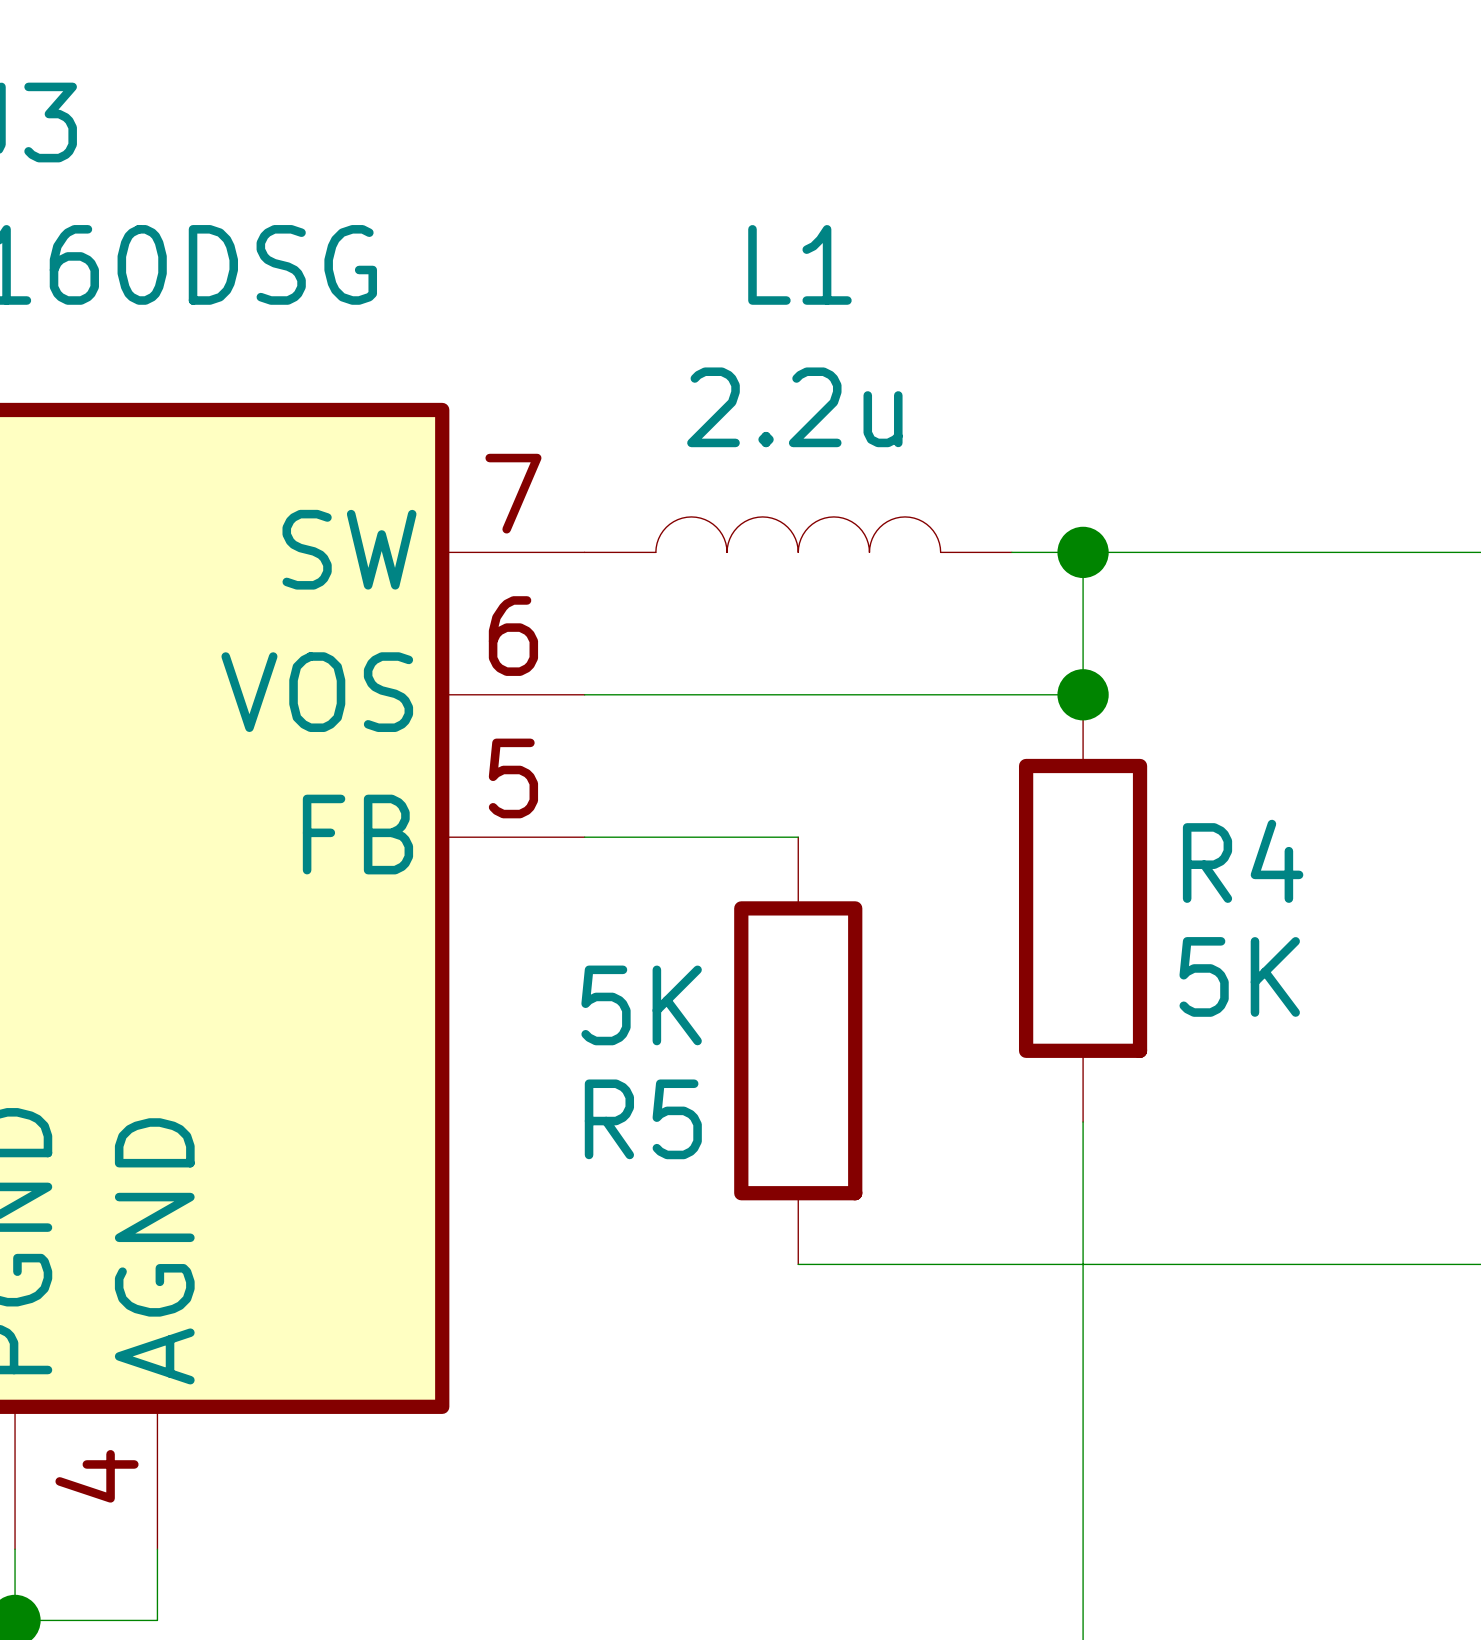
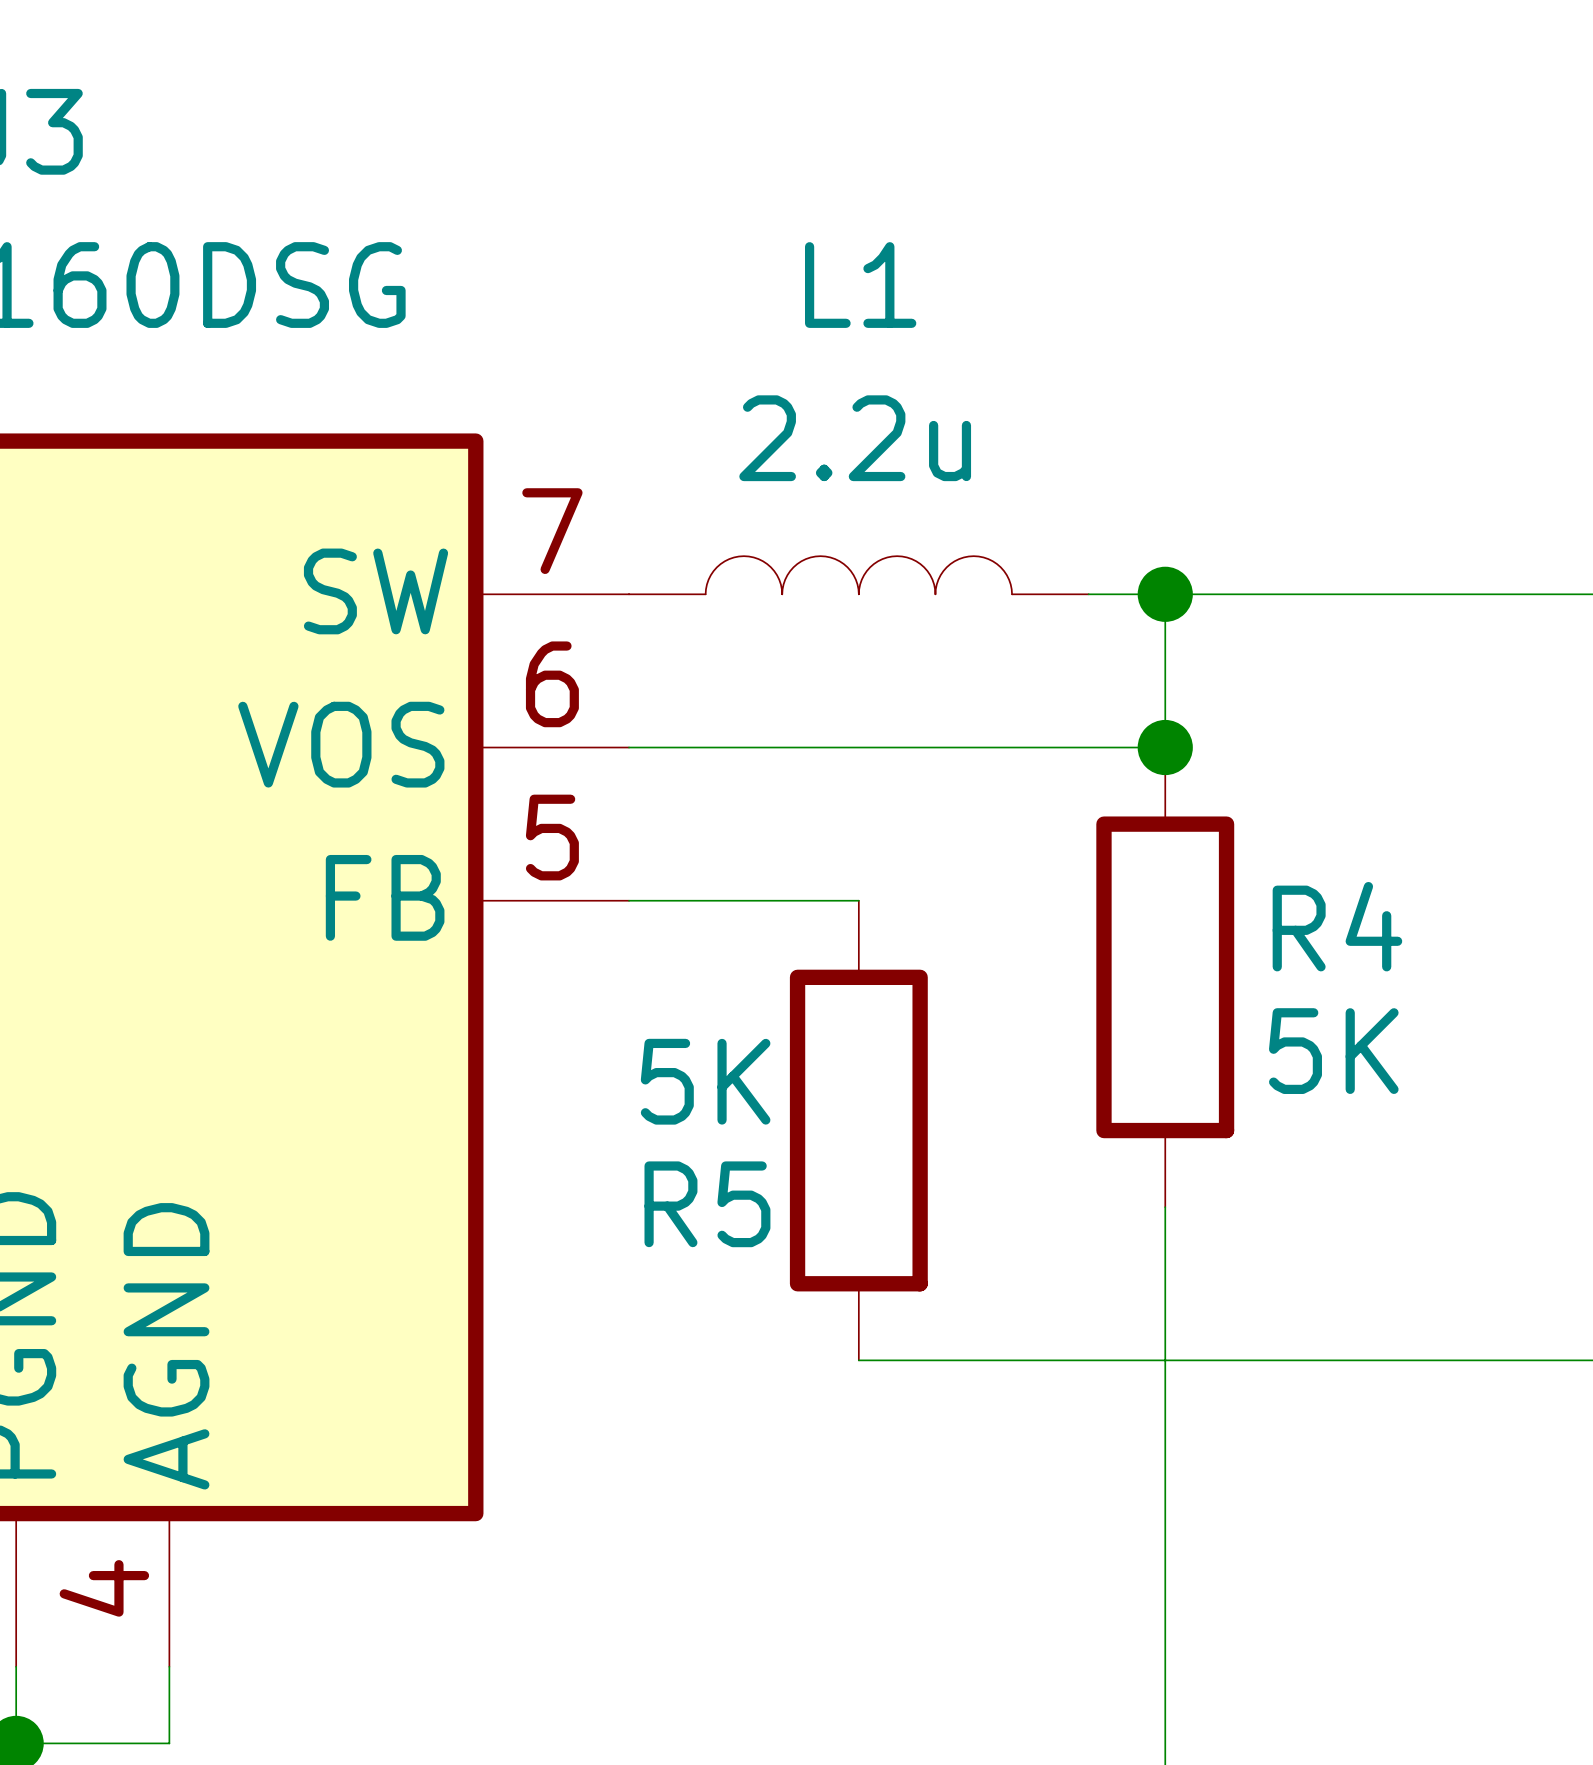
R5 value position: 5K (641, 1005) -> 5K (705, 1081)
R5 name position: R5 (643, 1119) -> R5 (707, 1204)

